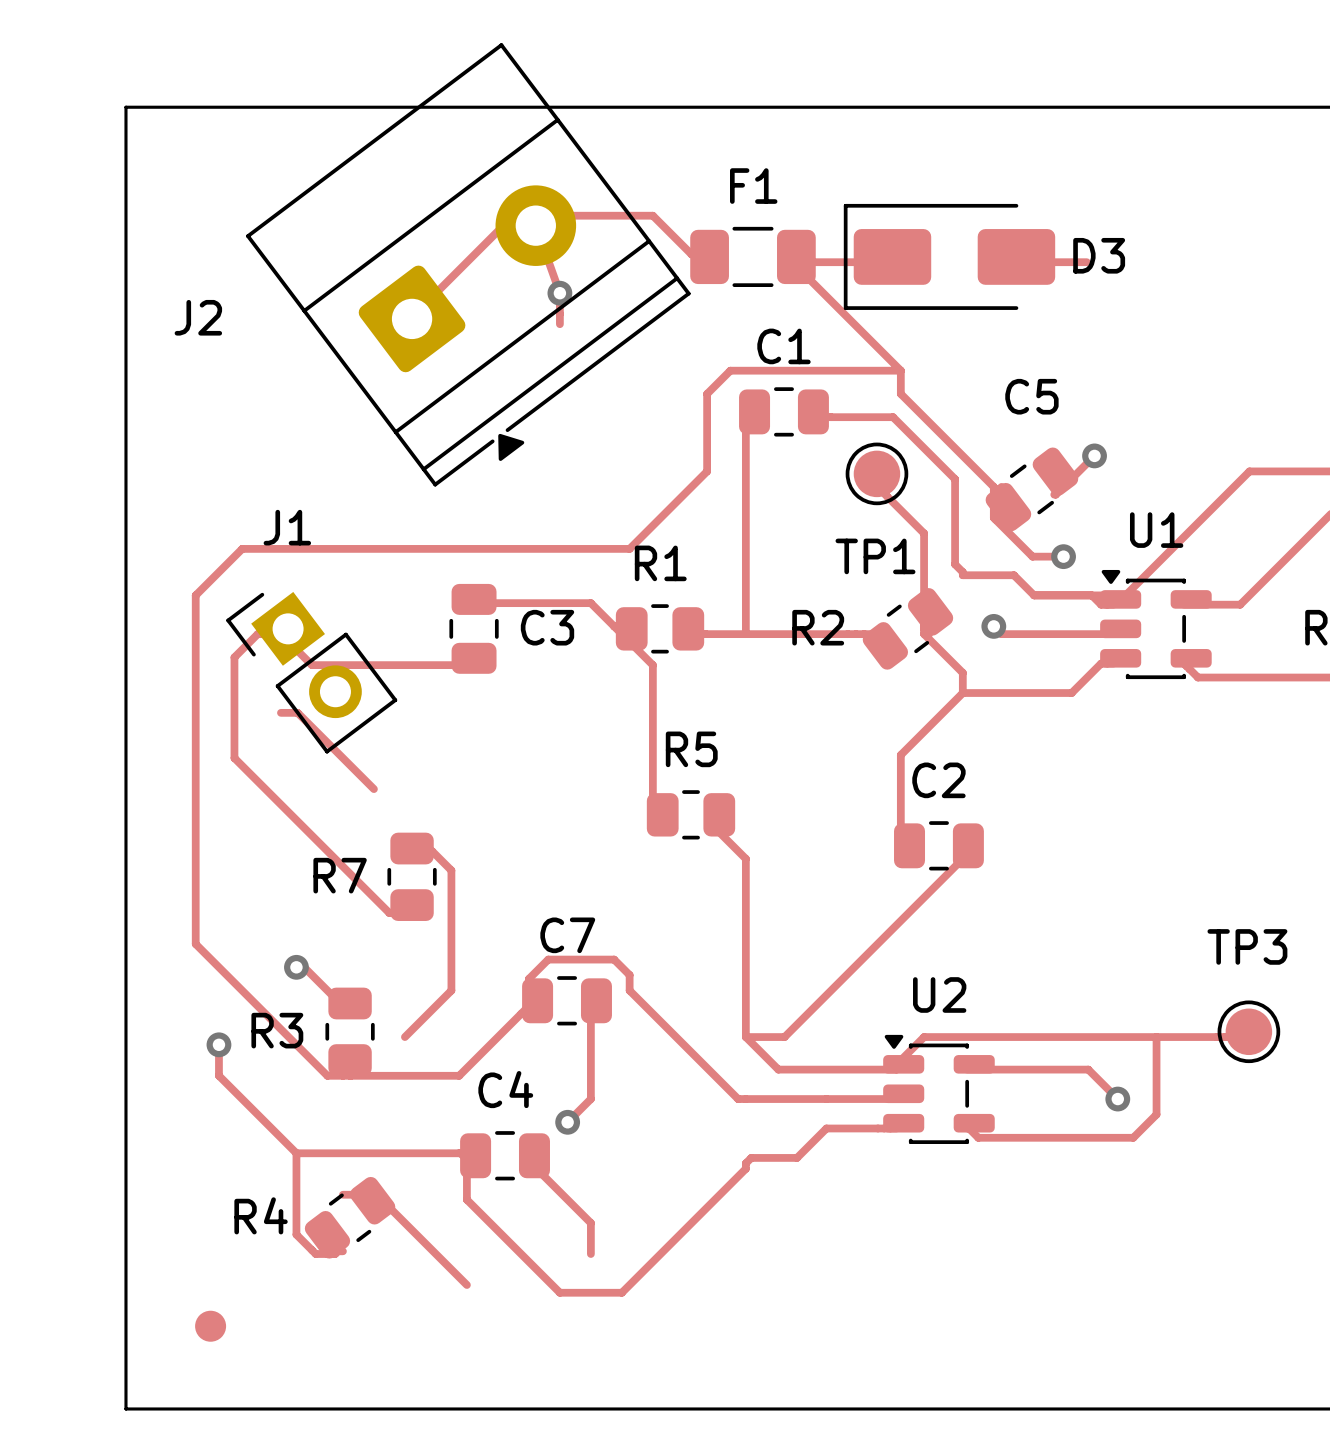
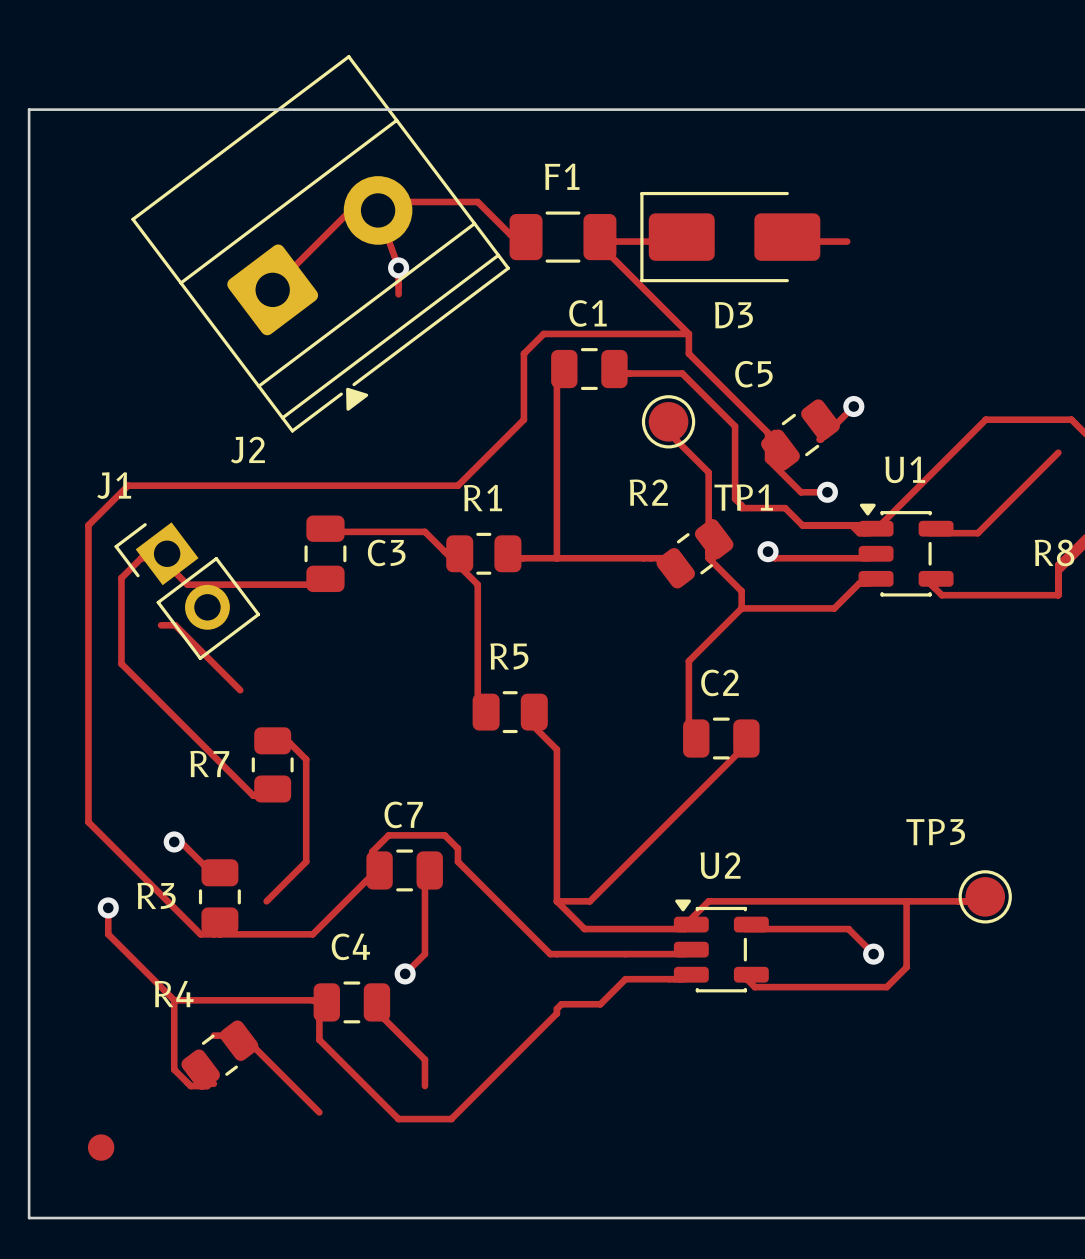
D3 name position: D3 (1099, 255) -> D3 (733, 315)
J2 name position: J2 (198, 317) -> J2 (247, 450)
C5 name position: C5 (1031, 396) -> C5 (753, 374)
J1 name position: J1 (287, 527) -> J1 (114, 485)
TP1 name position: TP1 (875, 556) -> TP1 (743, 497)
R2 name position: R2 (818, 627) -> R2 (648, 492)
TP3 name position: TP3 (1247, 946) -> TP3 (935, 832)
R4 name position: R4 (261, 1215) -> R4 (174, 994)

